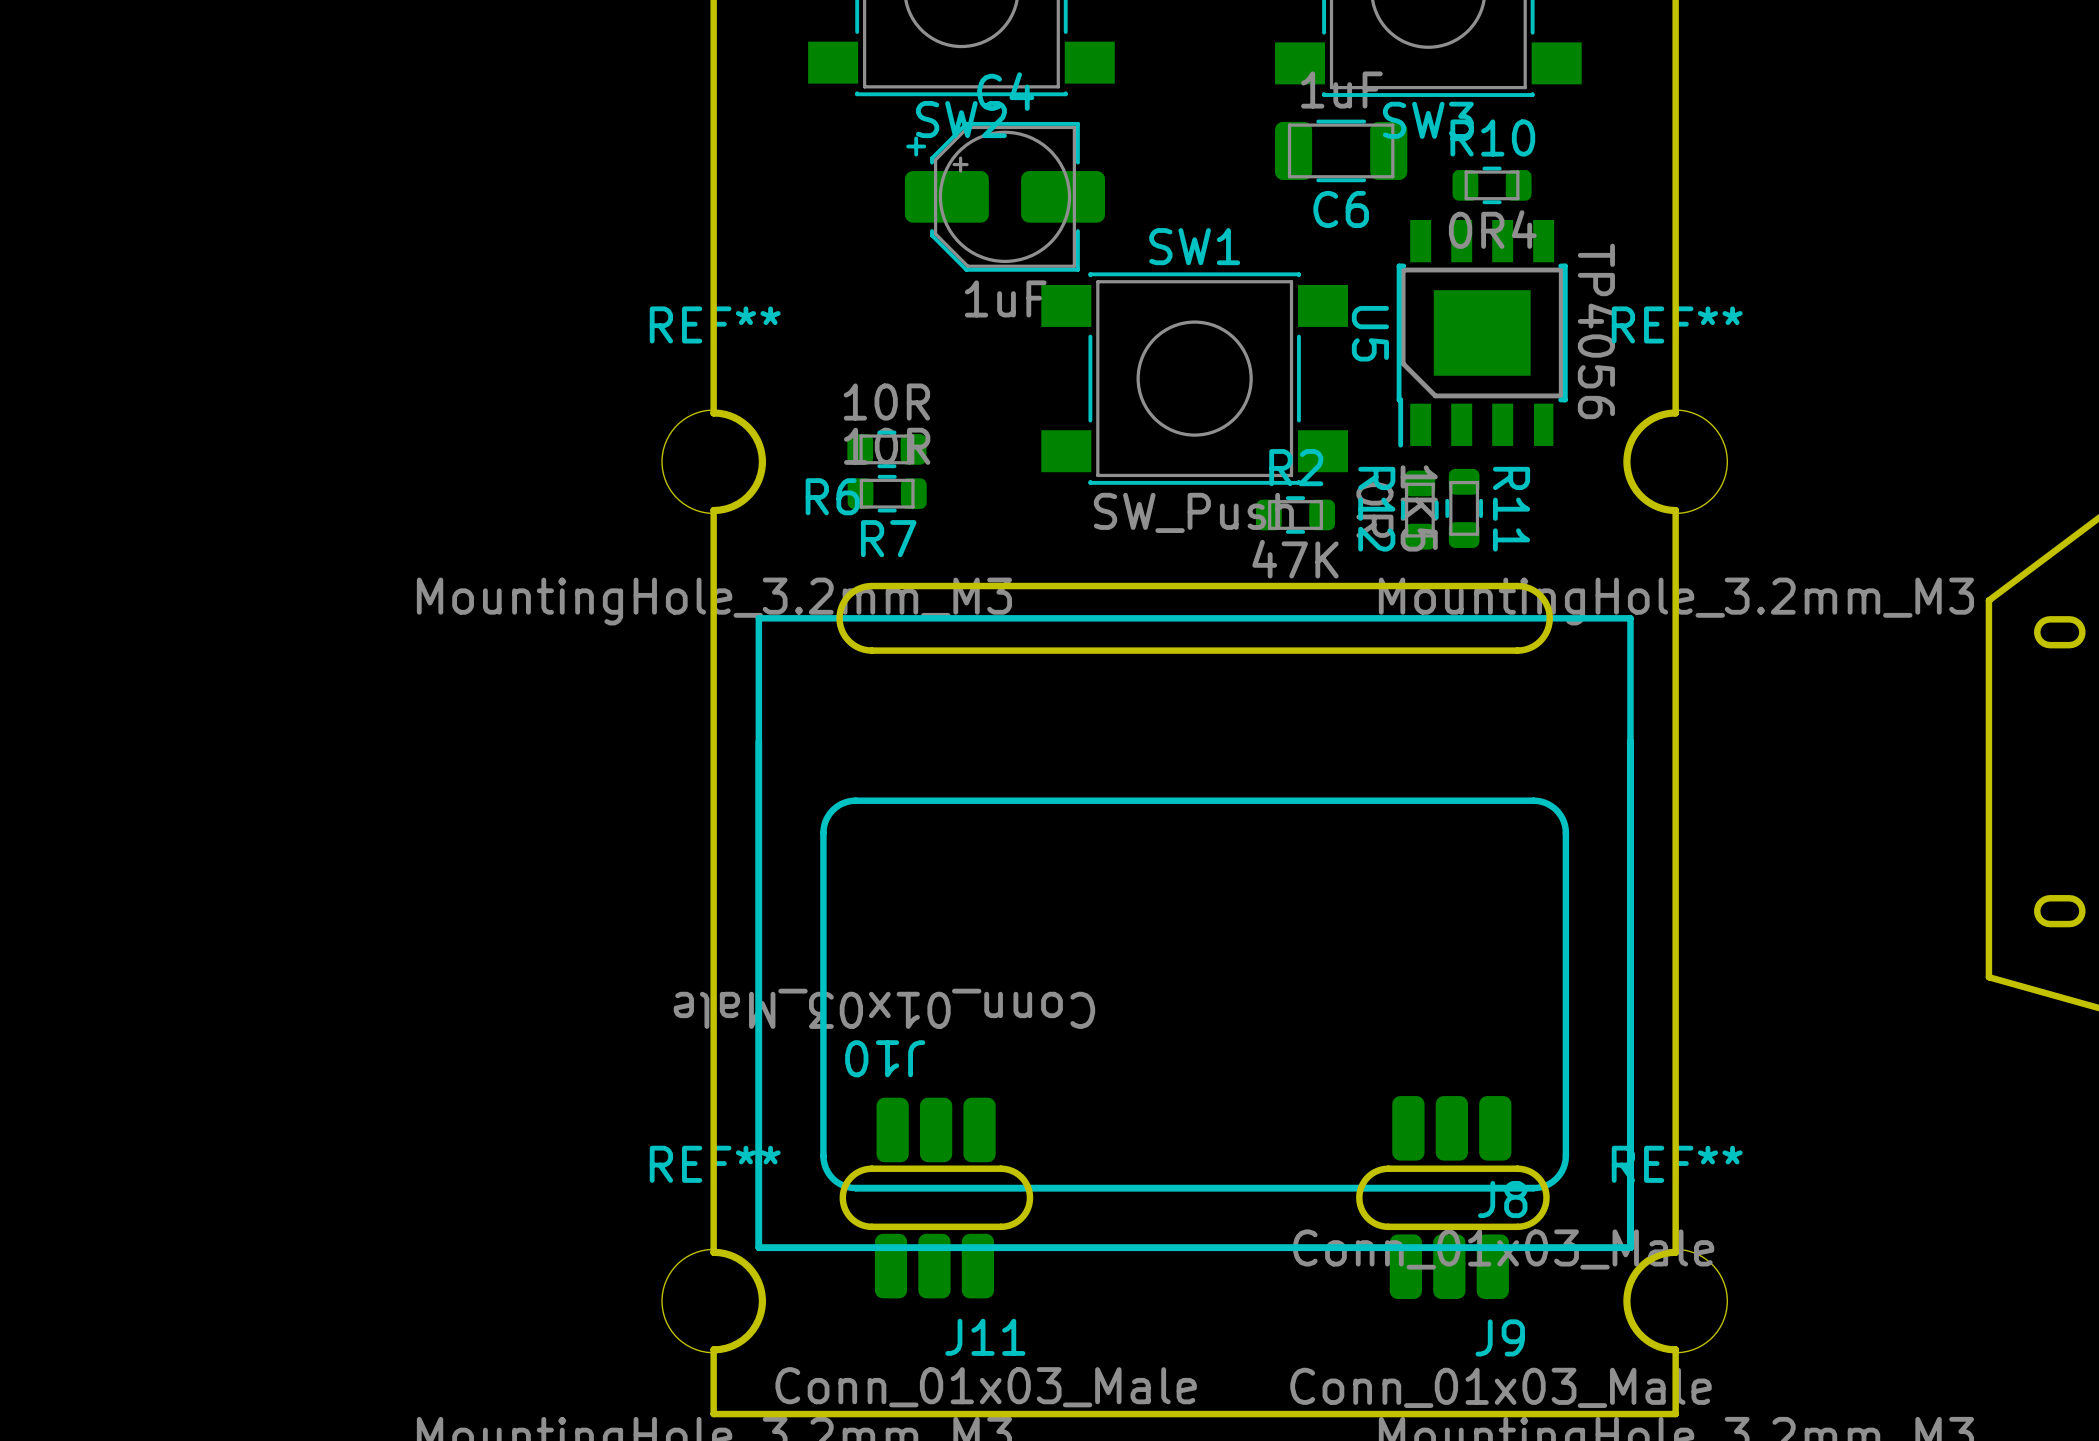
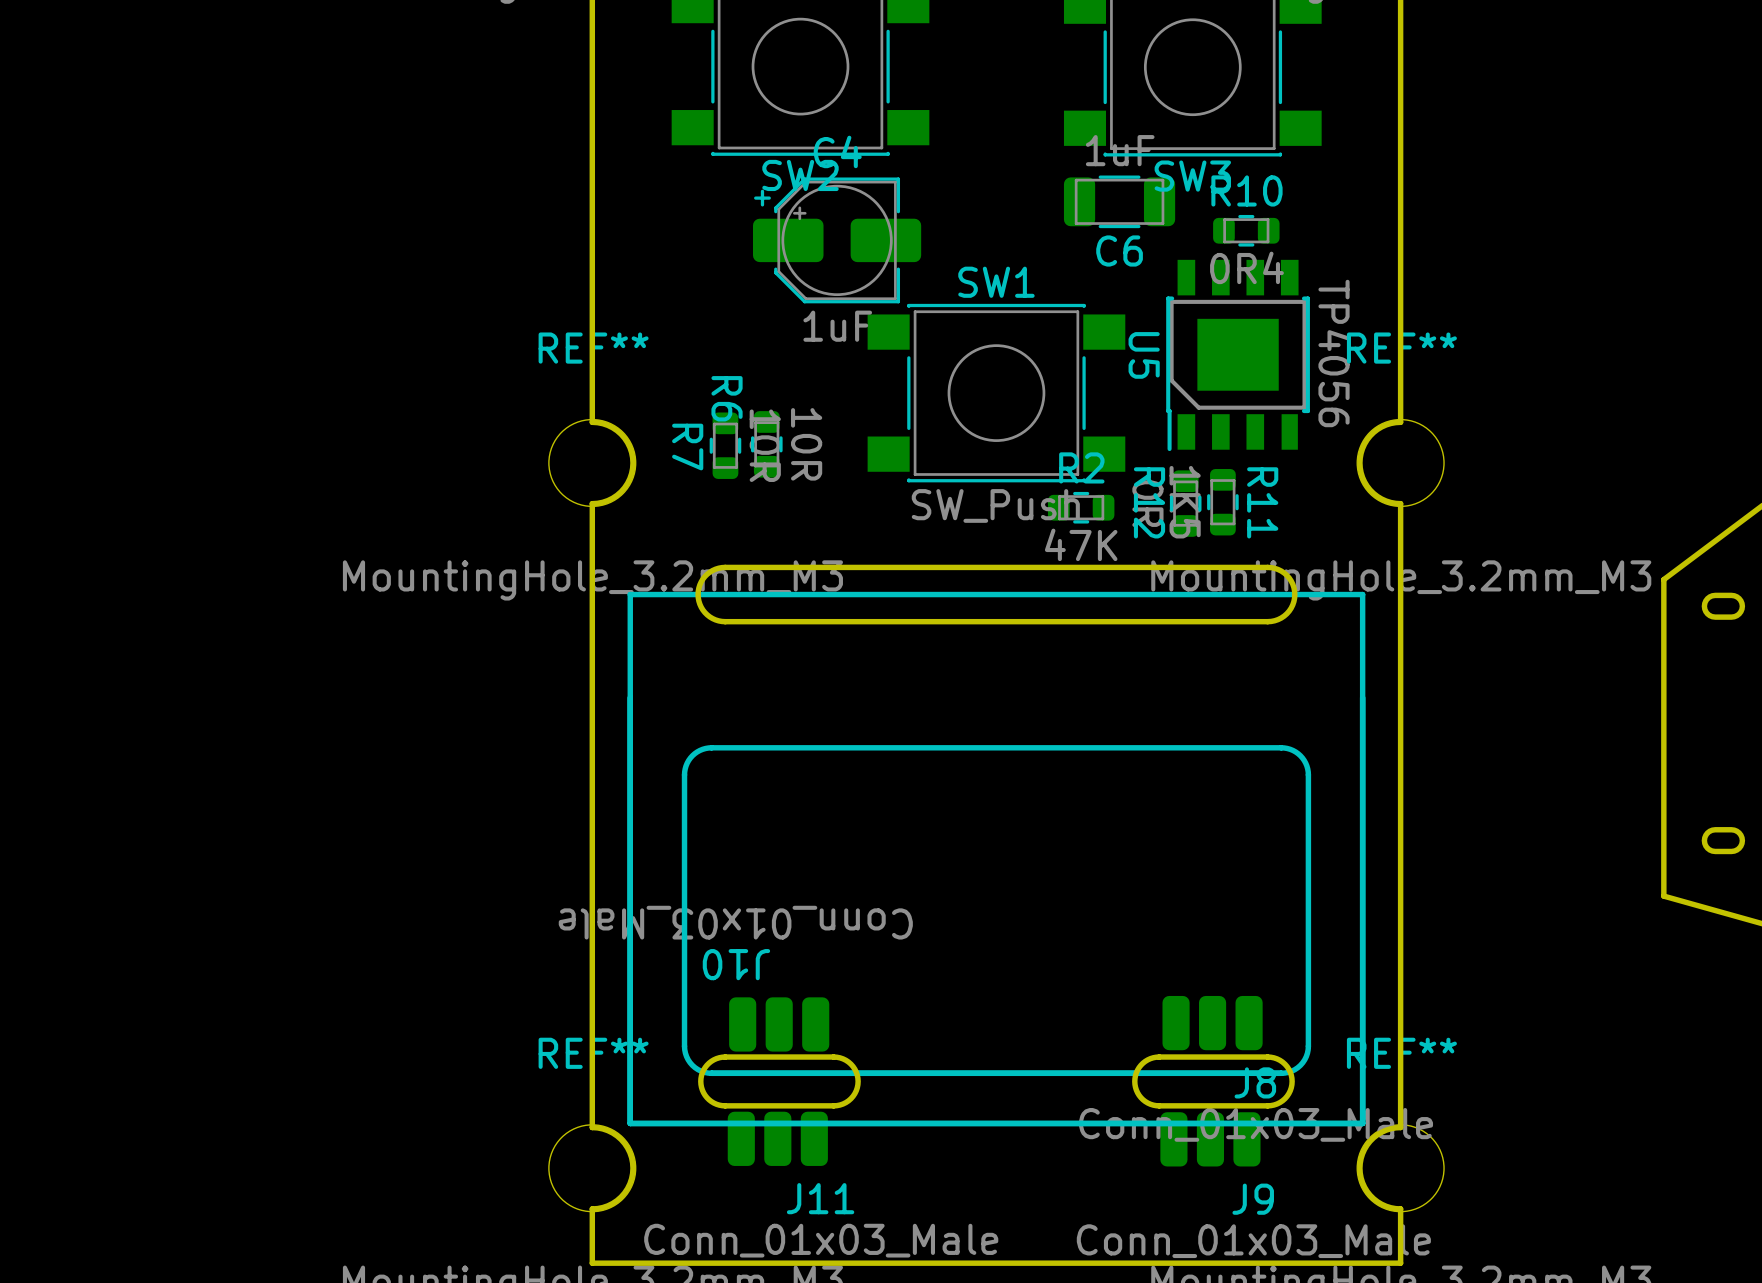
R6 rotation: 0° (886, 449) -> 90° clockwise (766, 444)
R7 rotation: 0° (887, 493) -> 90° clockwise (725, 445)
R7 position: (887, 493) -> (725, 445)

